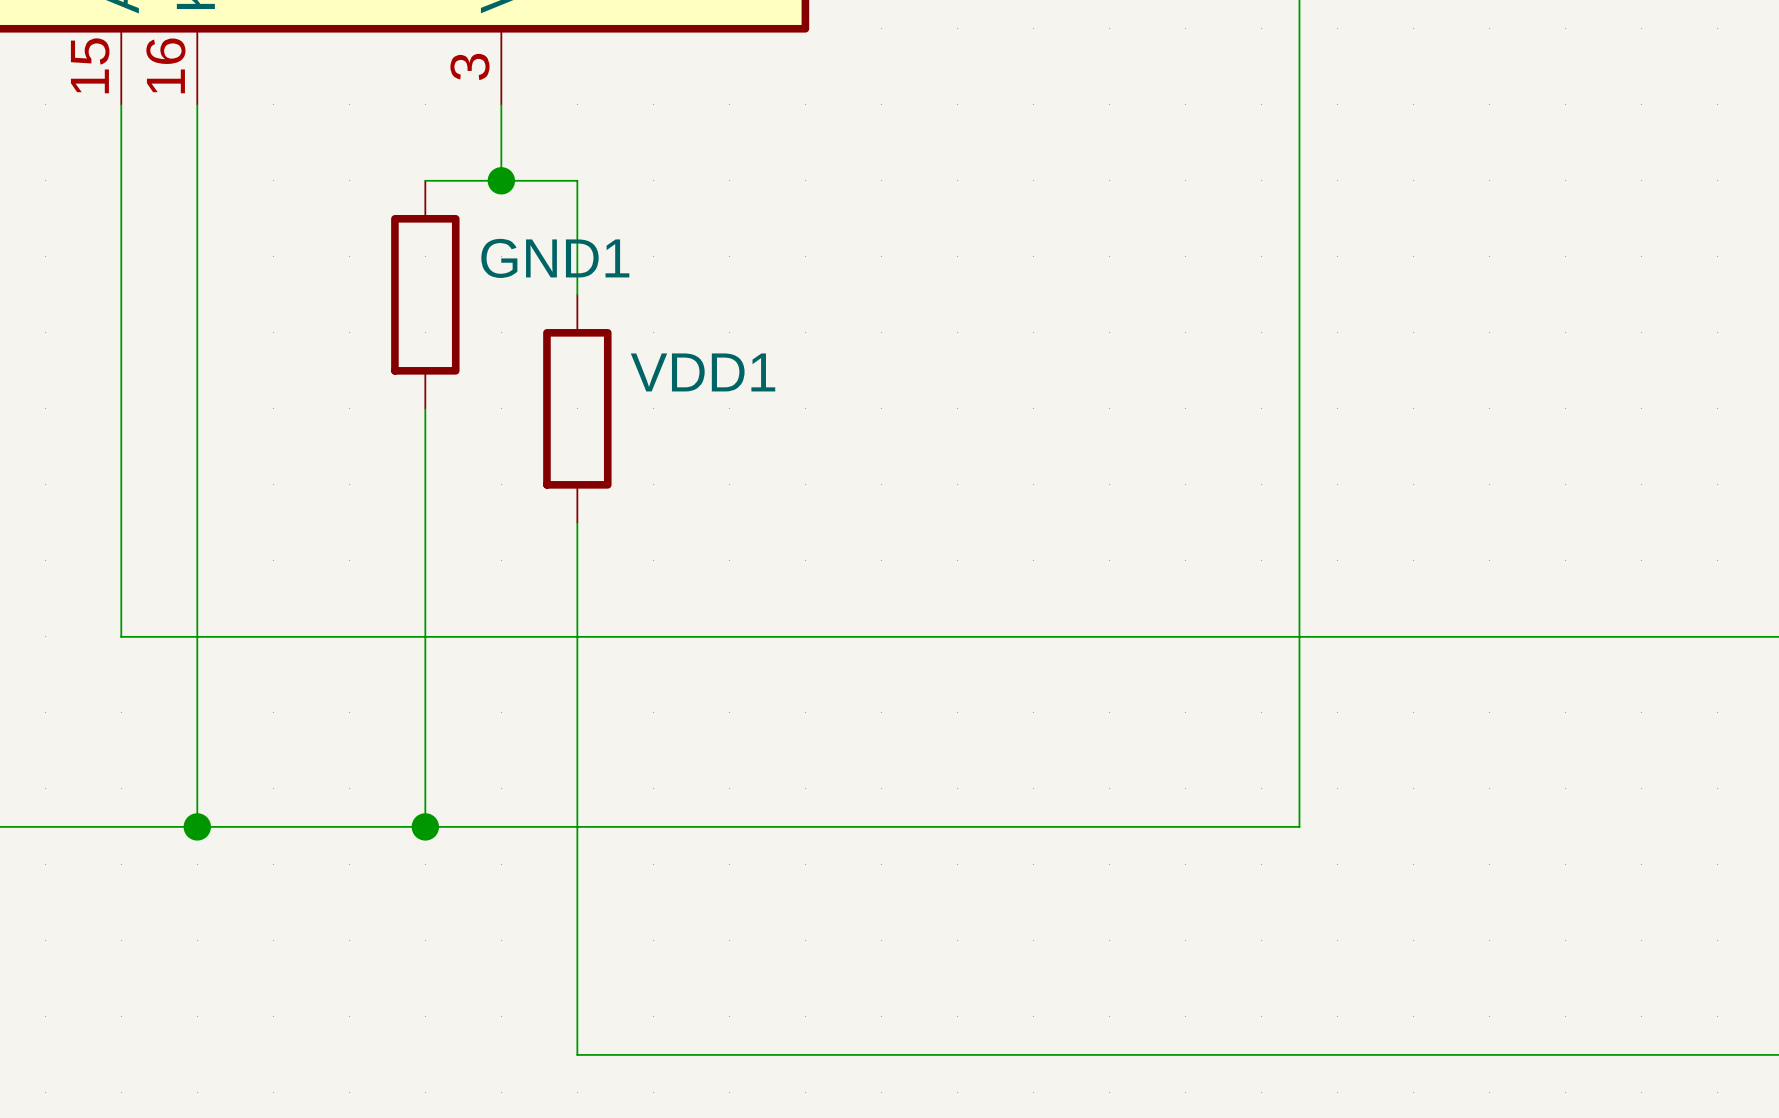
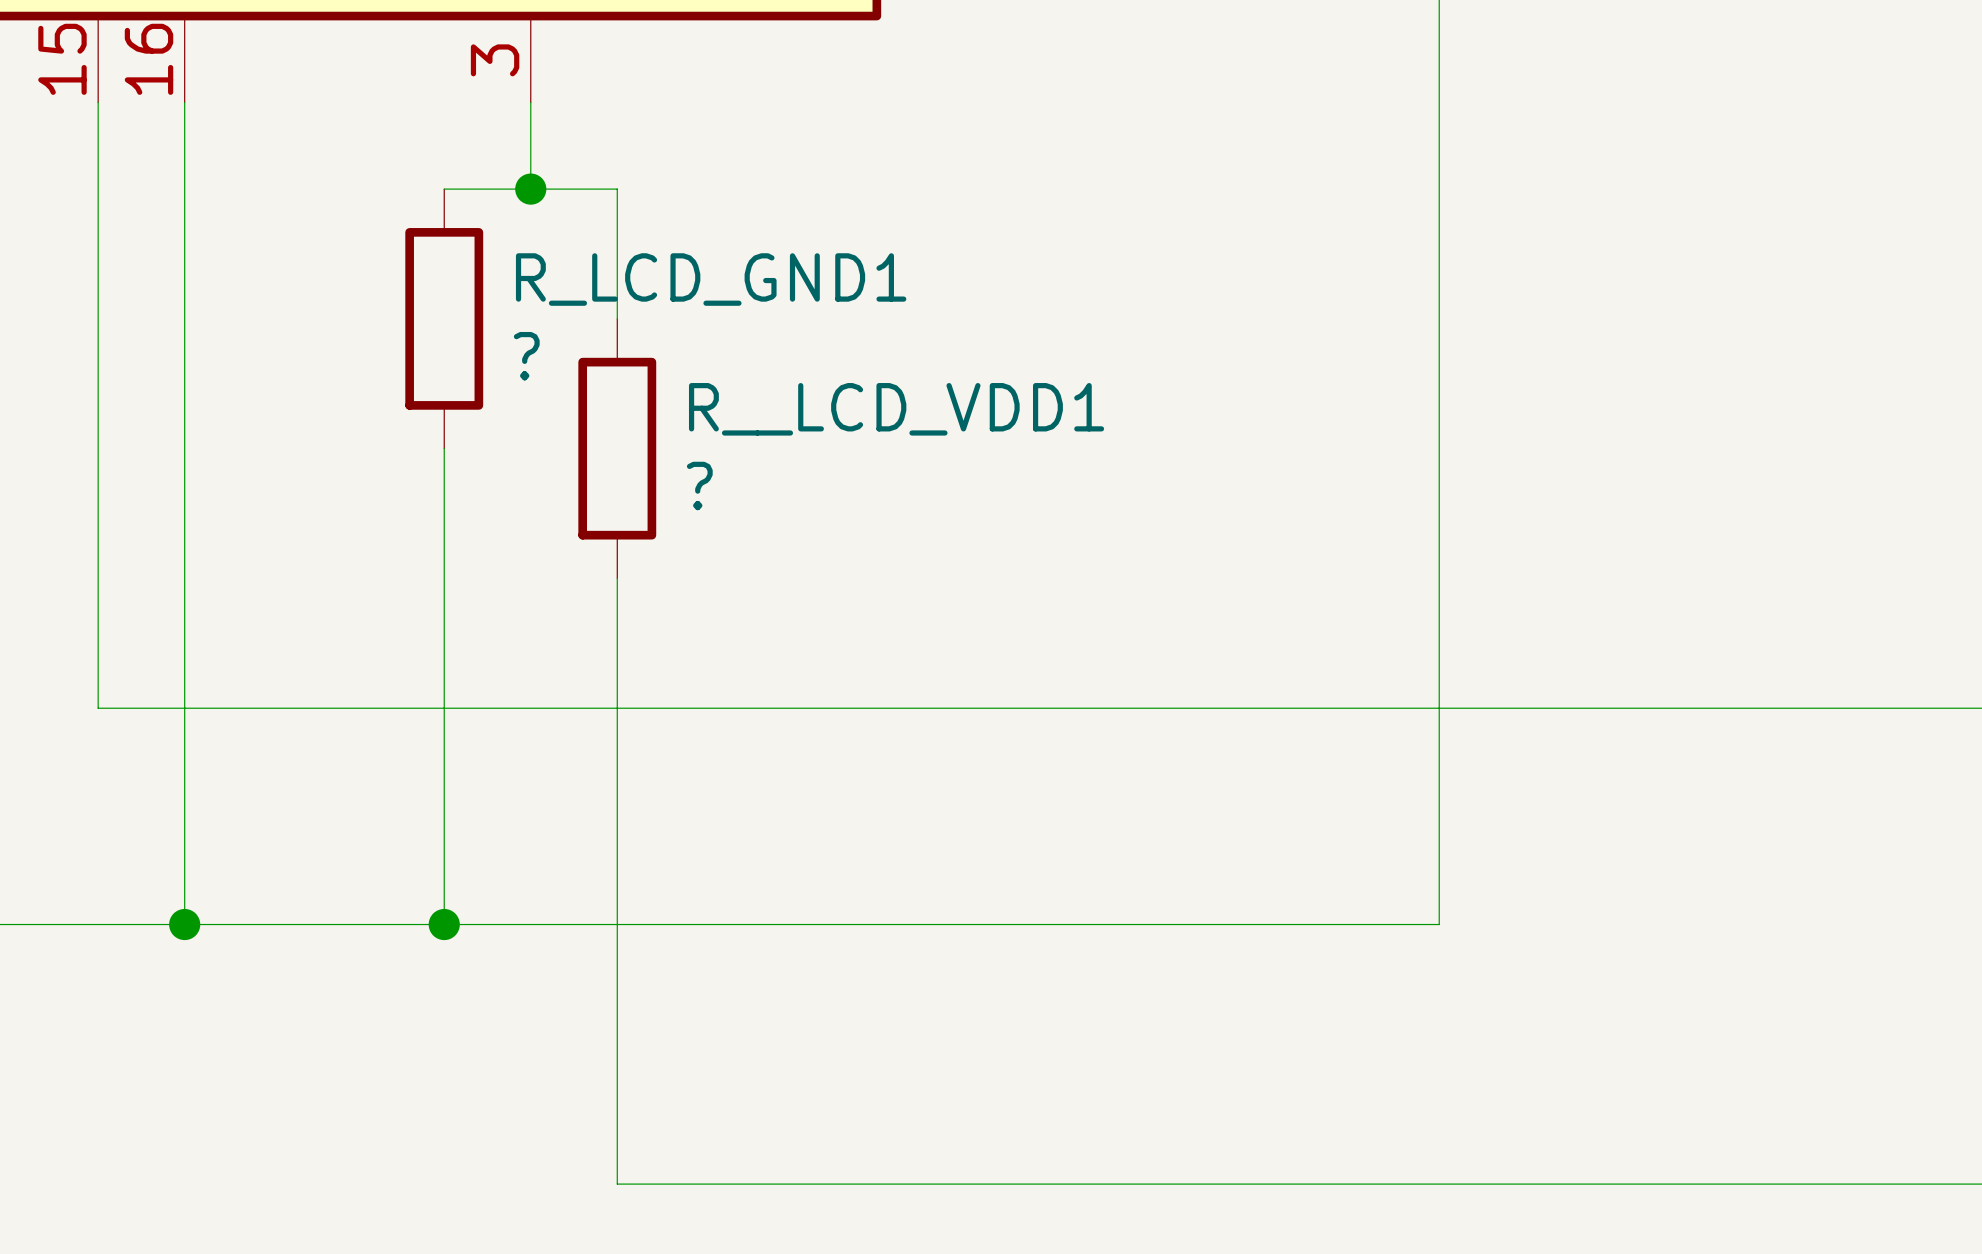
GND1 name: GND1 (555, 258) -> R_LCD_GND1 (711, 279)
GND1 value: none -> ? (526, 356)
VDD1 name: VDD1 (703, 372) -> R__LCD_VDD1 (896, 409)
VDD1 value: none -> ? (699, 485)

